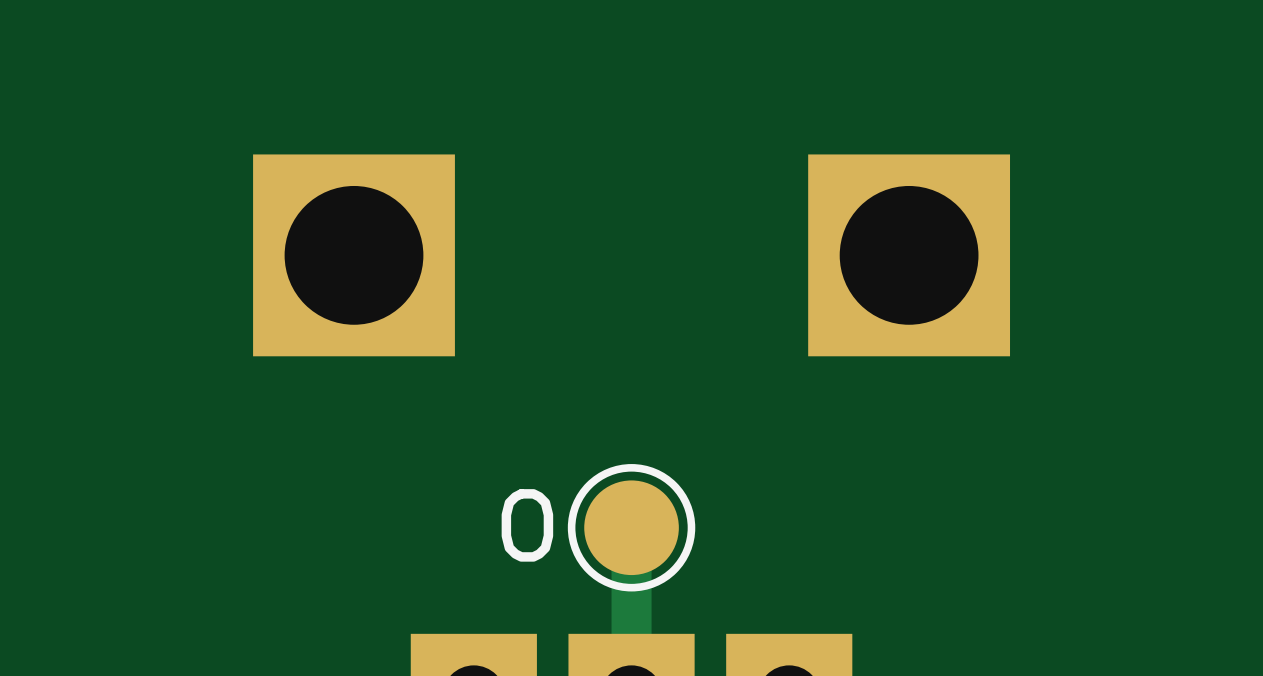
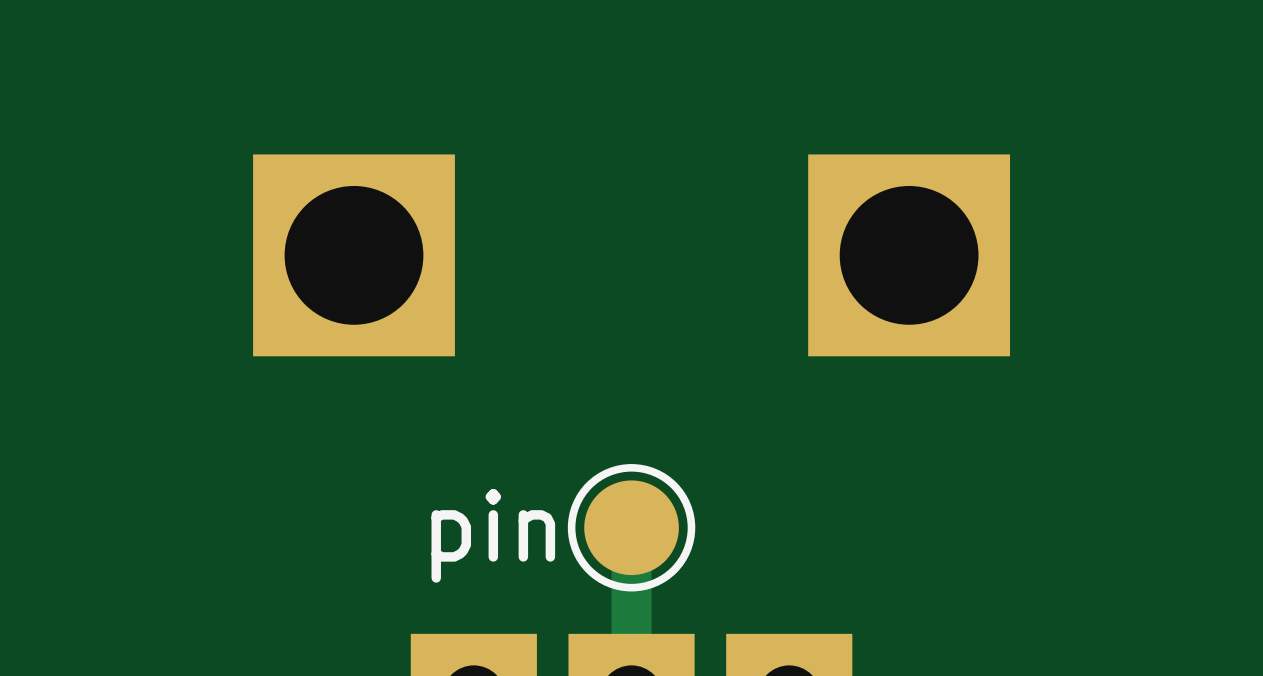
text: O (527, 525) -> pin (493, 535)

